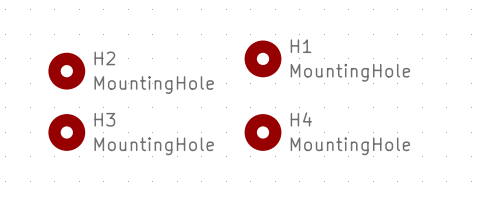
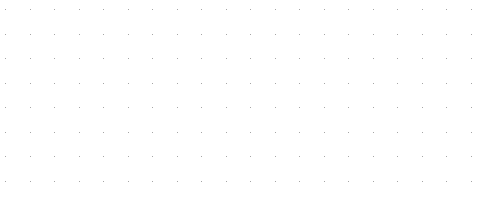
H1: MountingHole (263, 58) -> none
H2: MountingHole (66, 71) -> none
H3: MountingHole (66, 132) -> none
H4: MountingHole (263, 132) -> none

